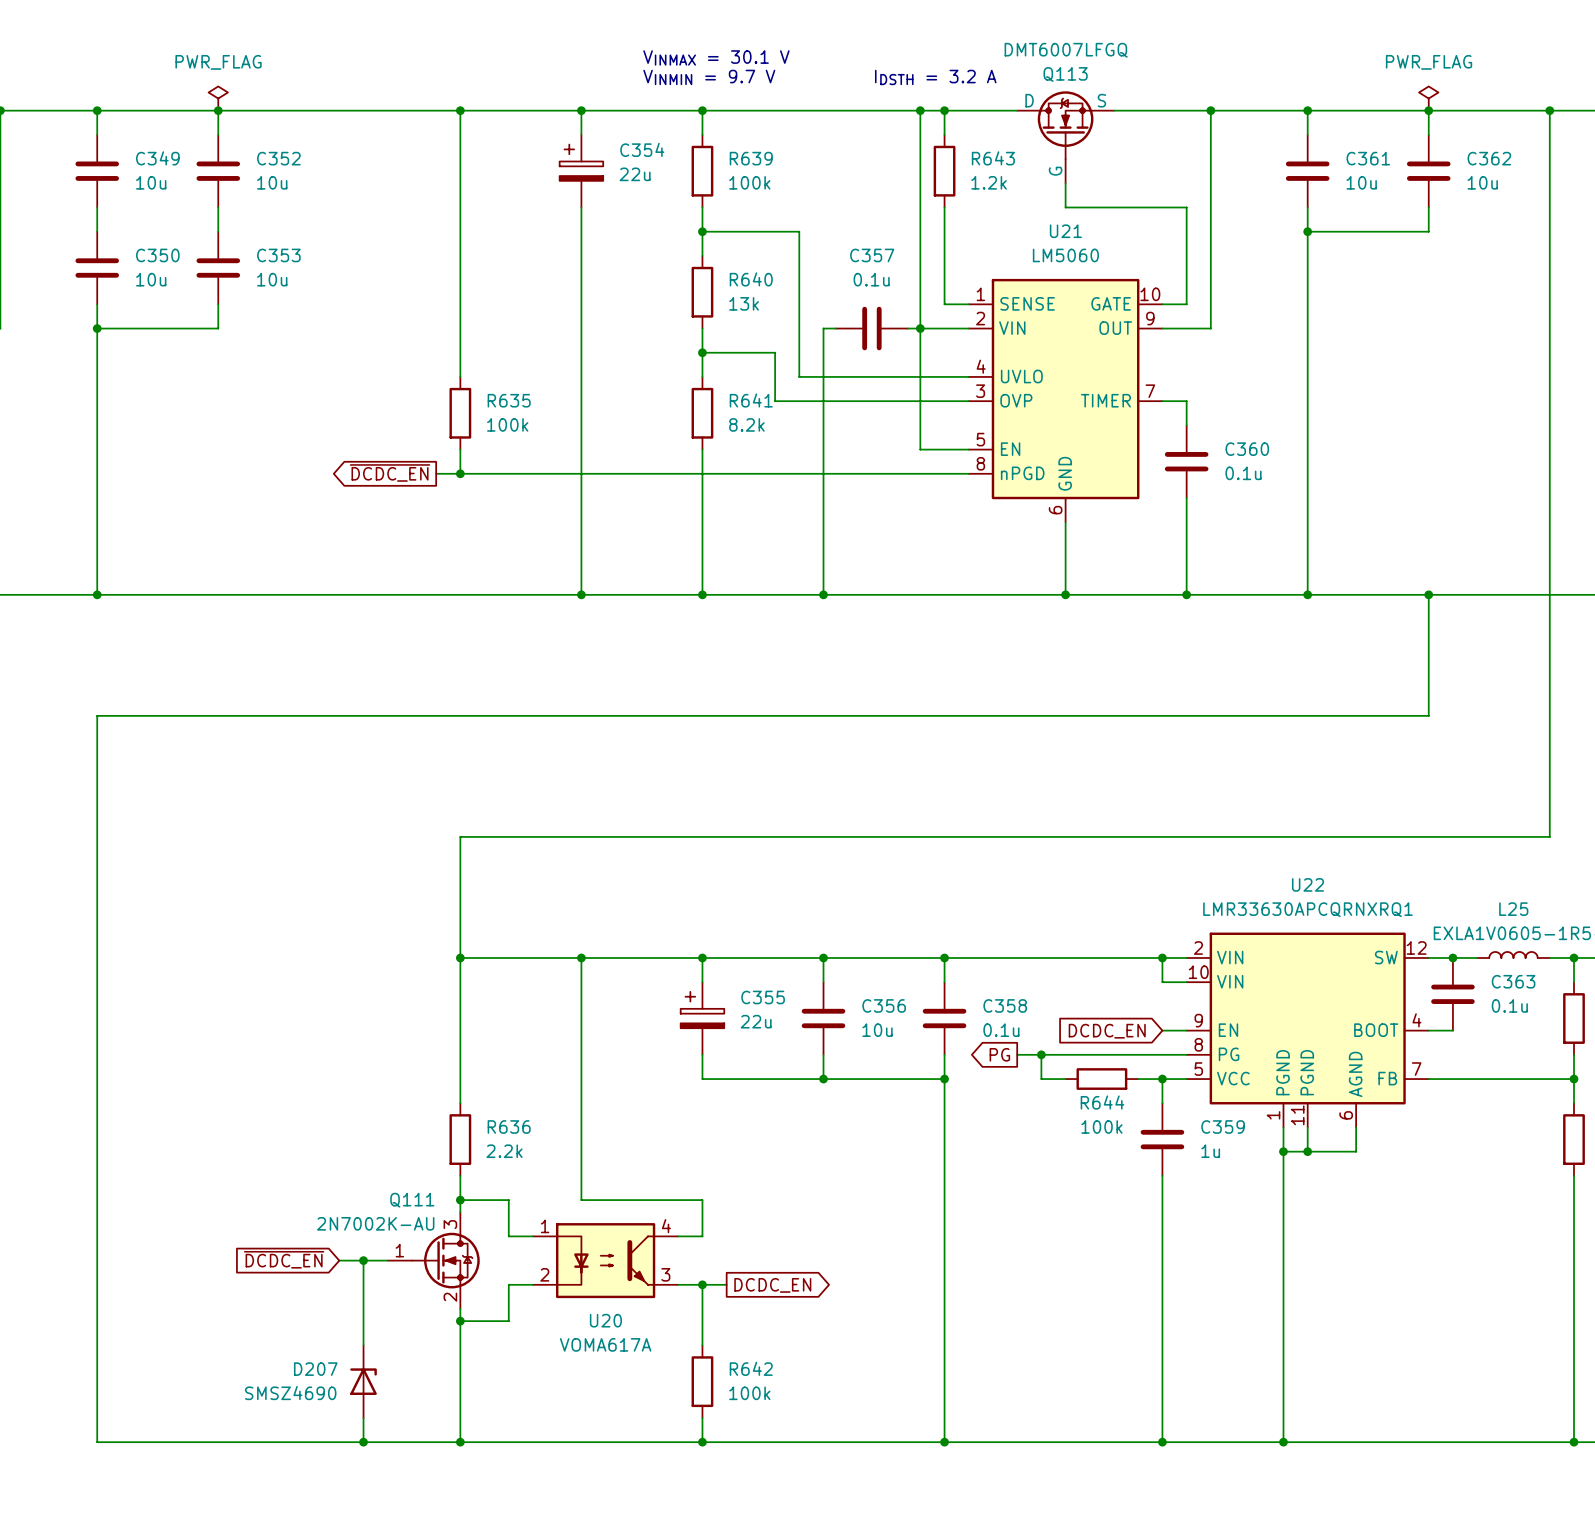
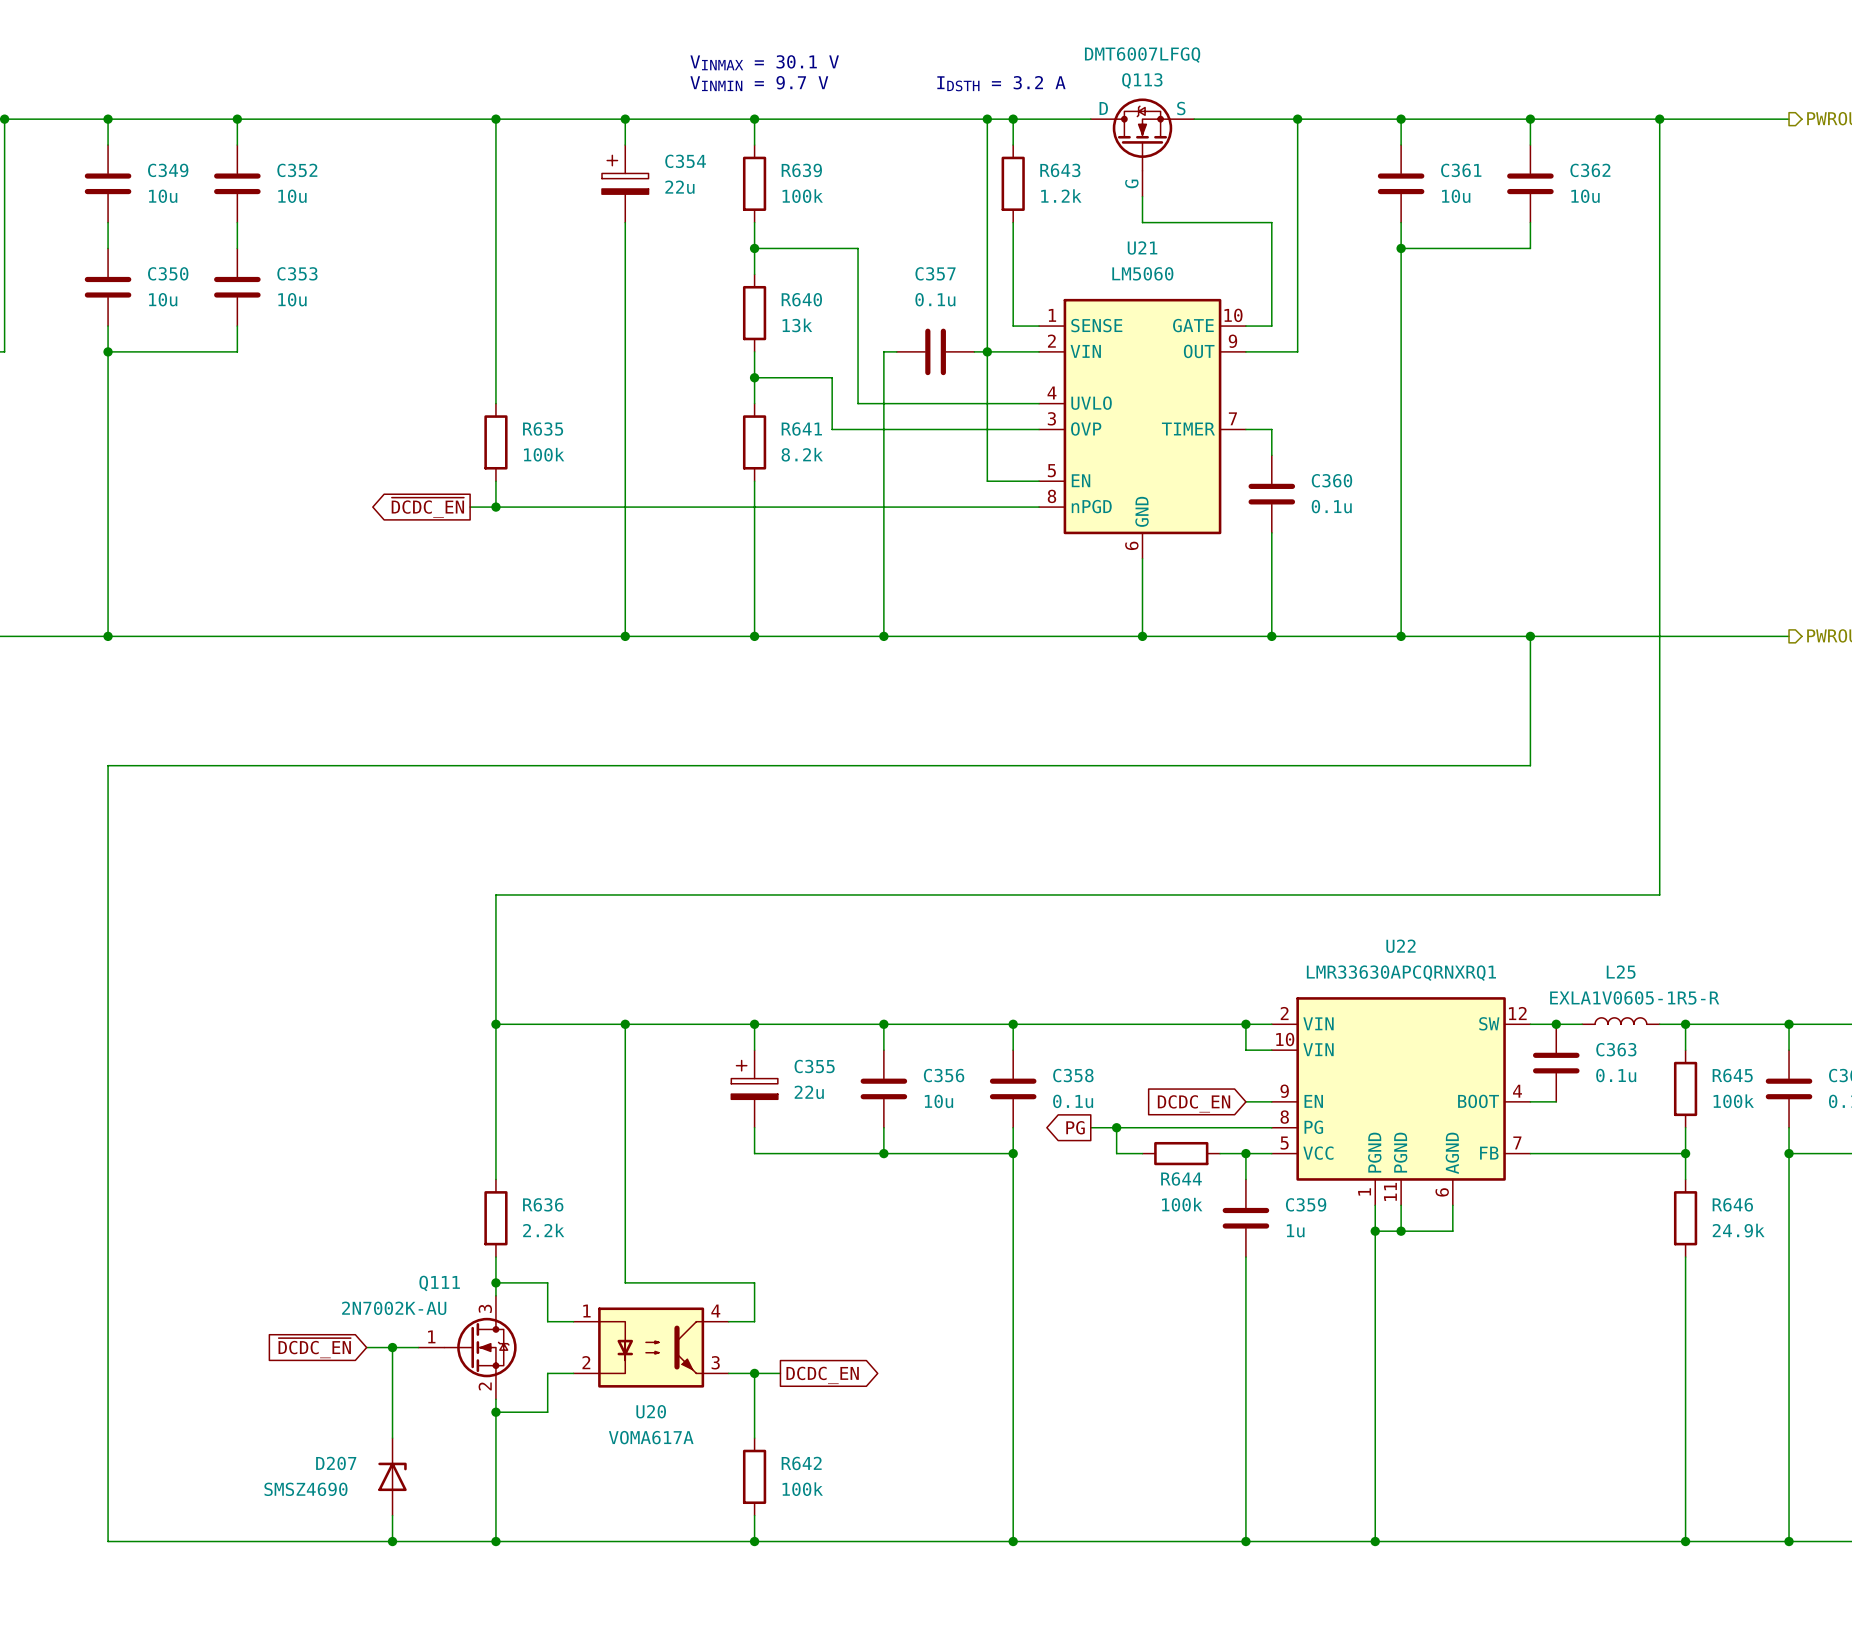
power symbol: PWR_FLAG (218, 98) -> none
power symbol: PWR_FLAG (1428, 98) -> none

